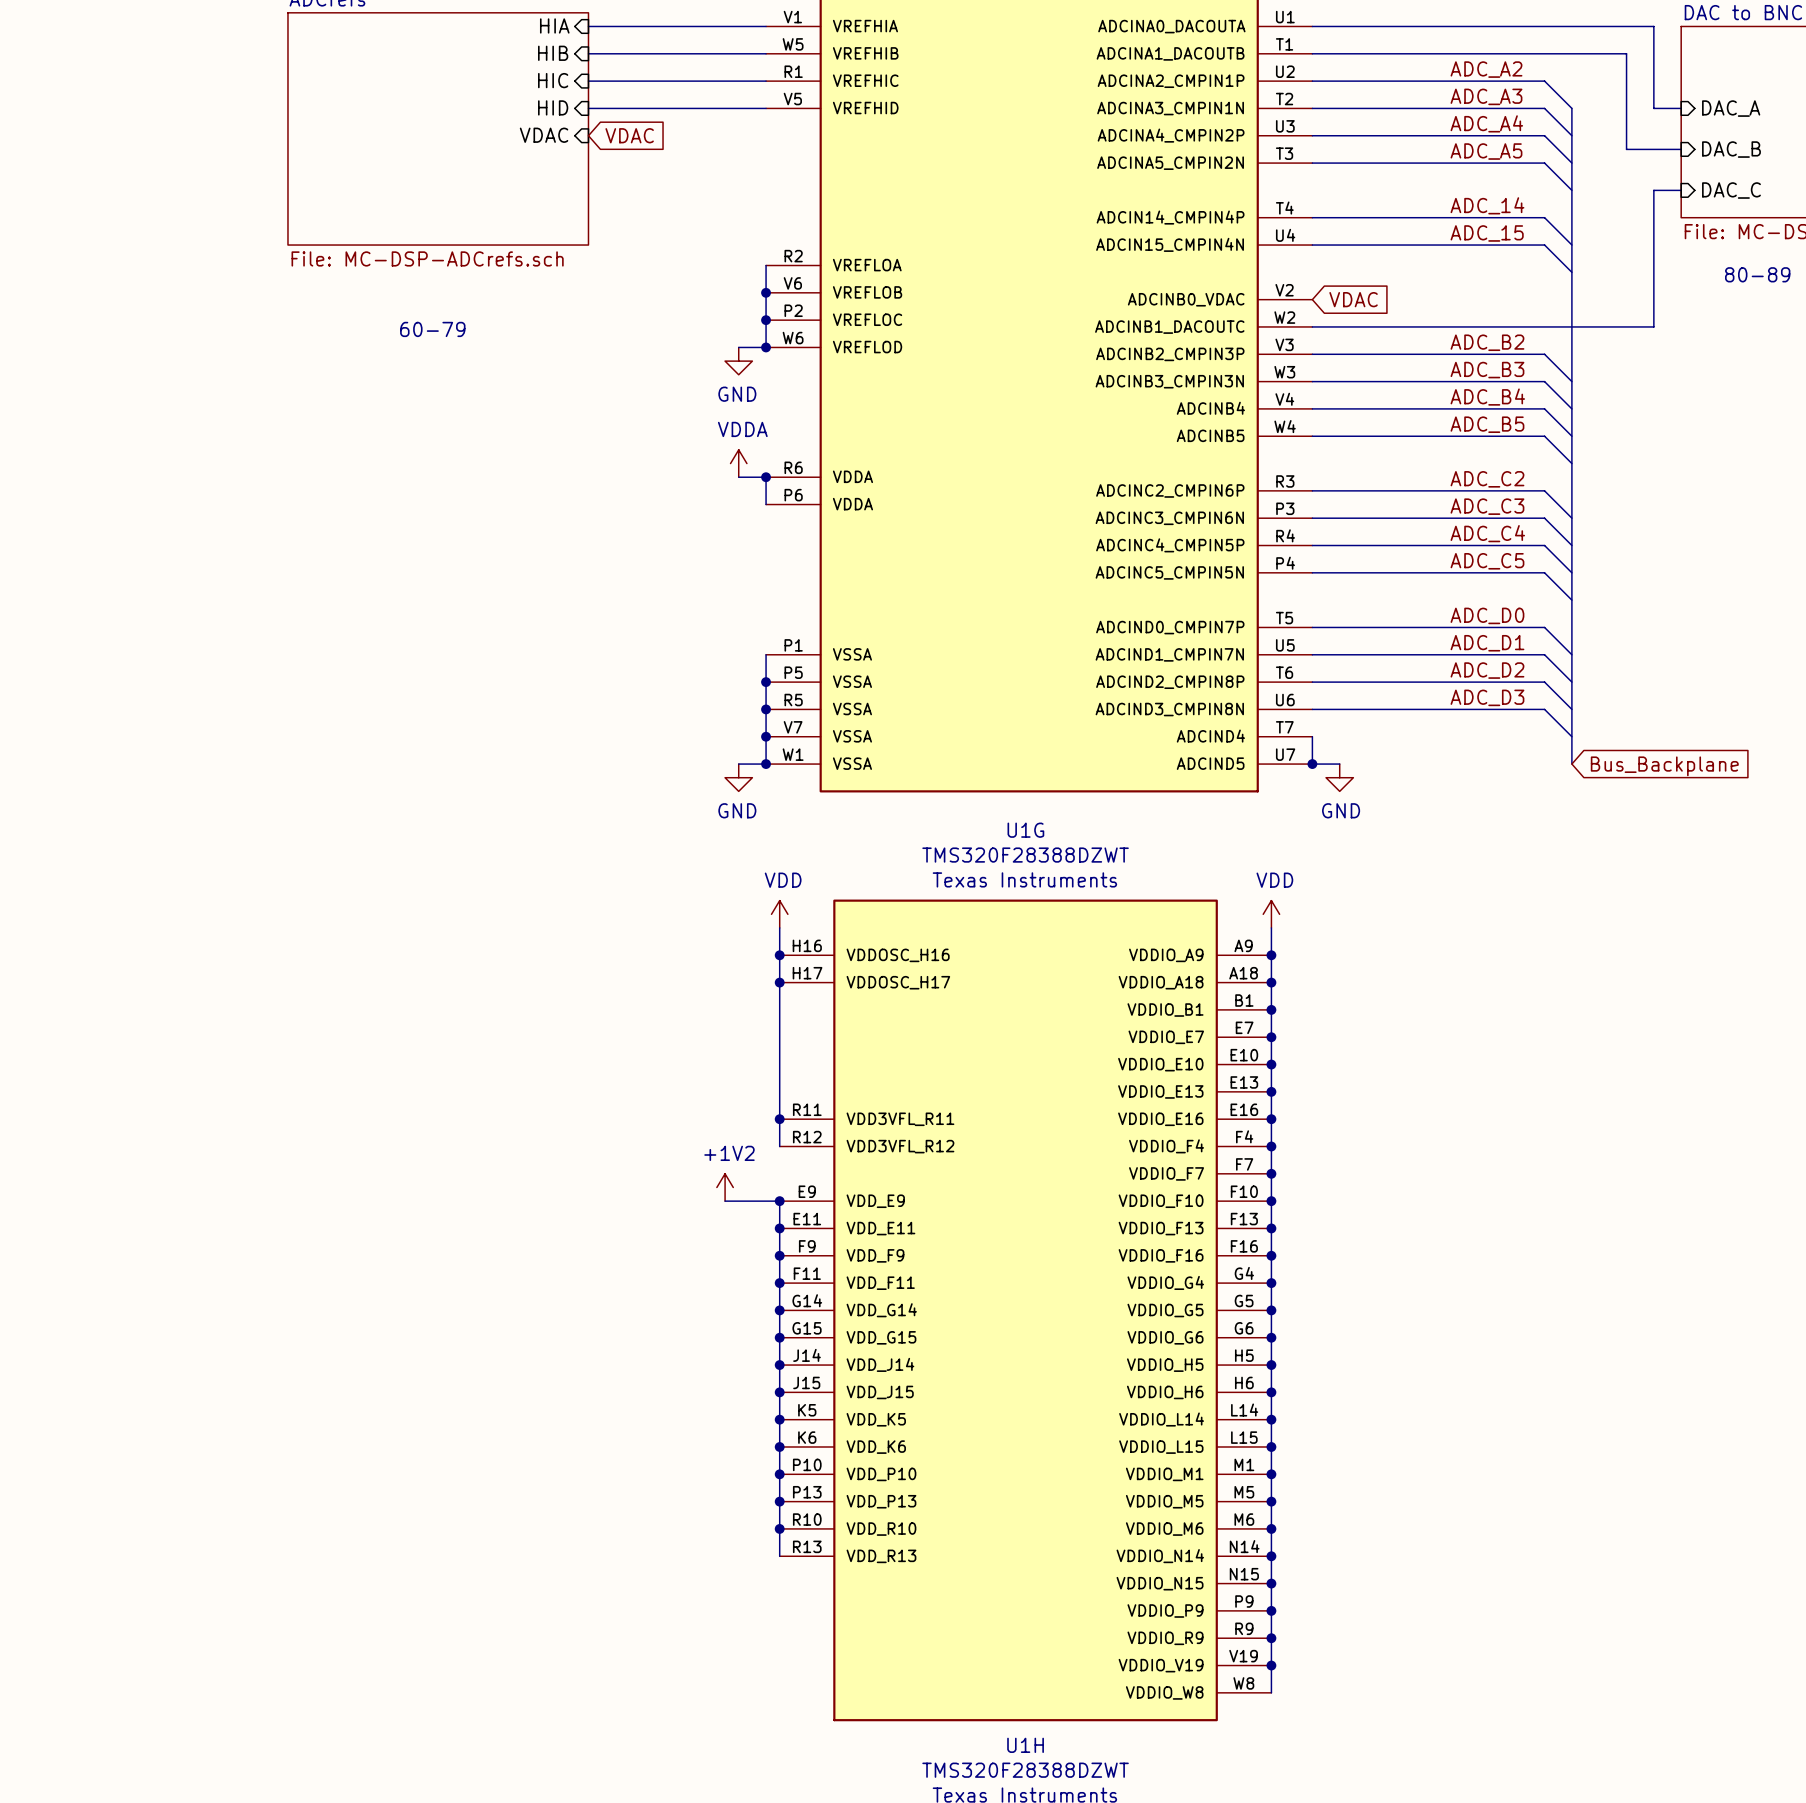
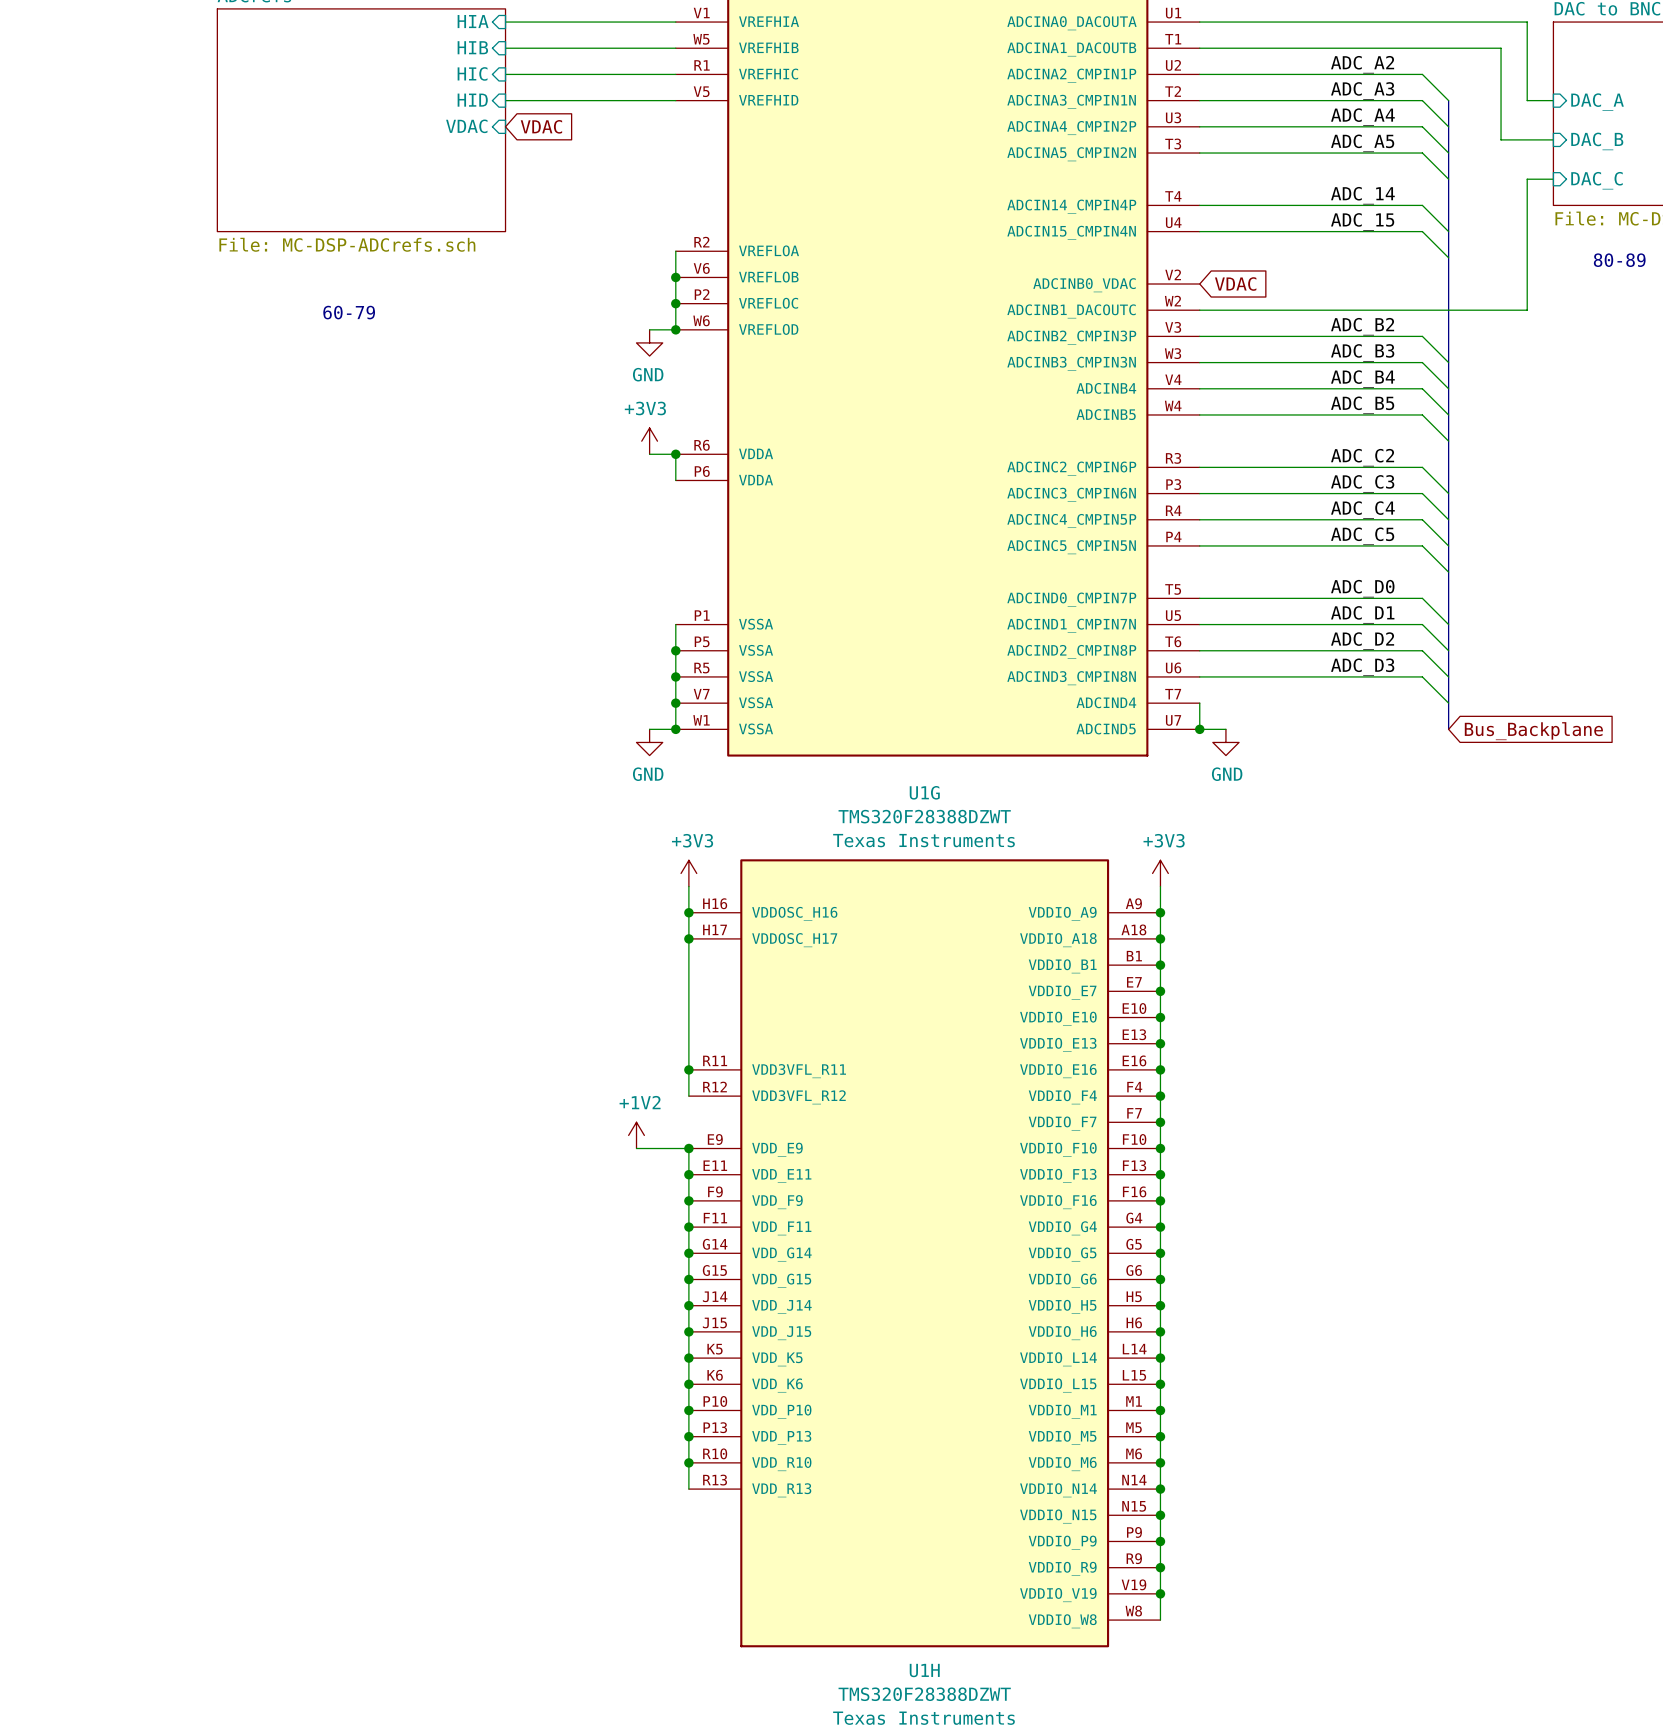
power symbol: VDDA (738, 463) -> +3V3 (649, 441)
power symbol: VDD (779, 914) -> +3V3 (688, 873)
power symbol: VDD (1271, 914) -> +3V3 (1160, 873)

